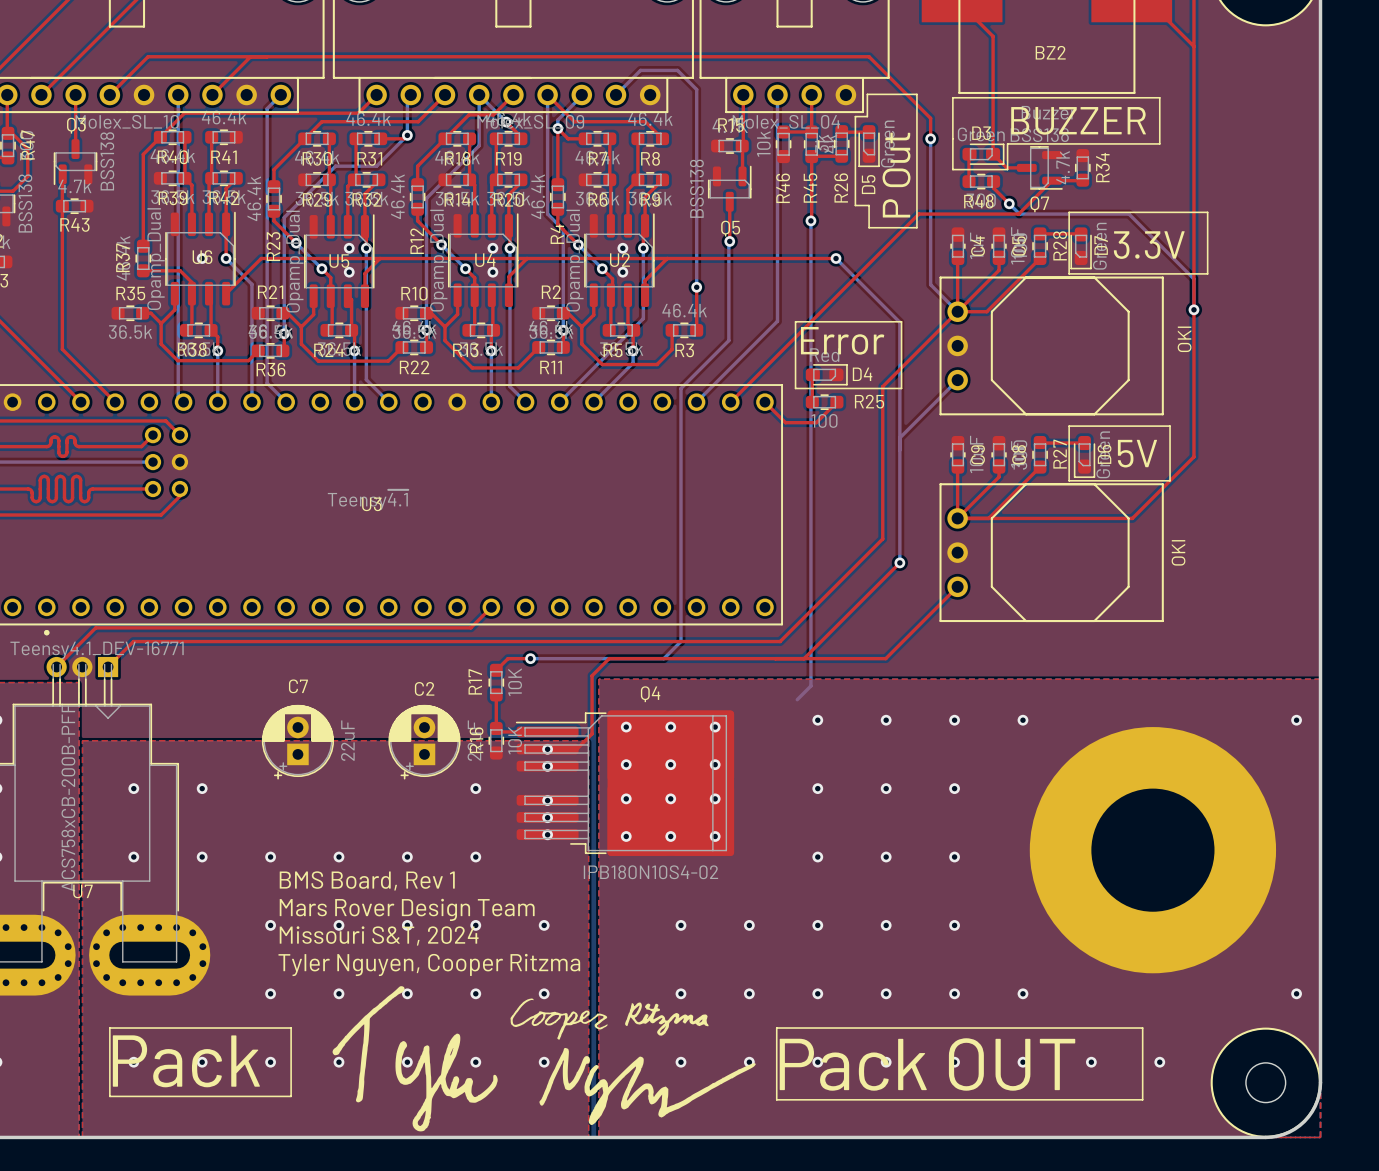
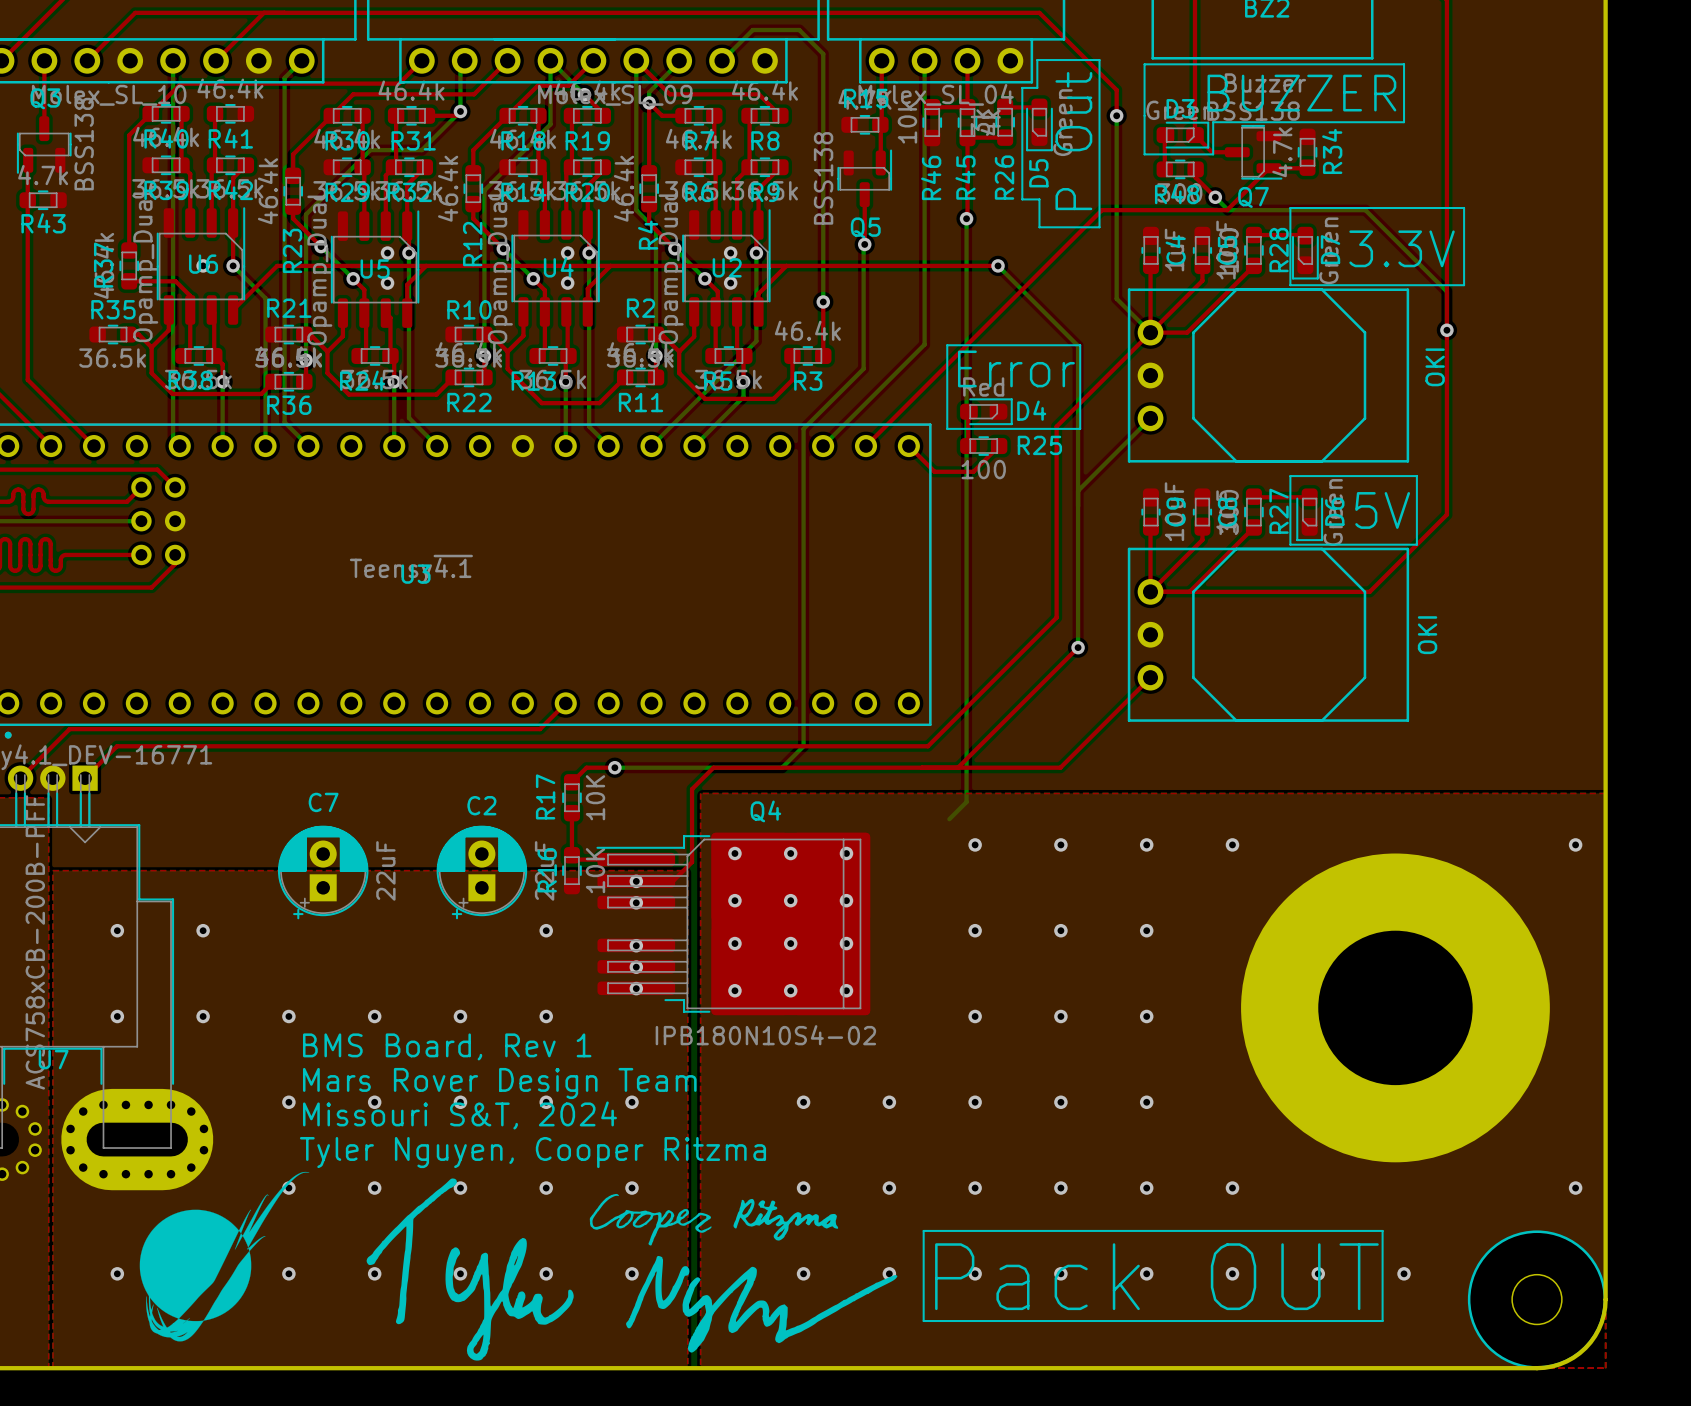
drawing: none -> [139, 1171, 310, 1342]
line: (109, 1028) (291, 1028) (291, 1096) (109, 1096) (109, 1028) -> none
text: Pack (186, 1061) -> none

